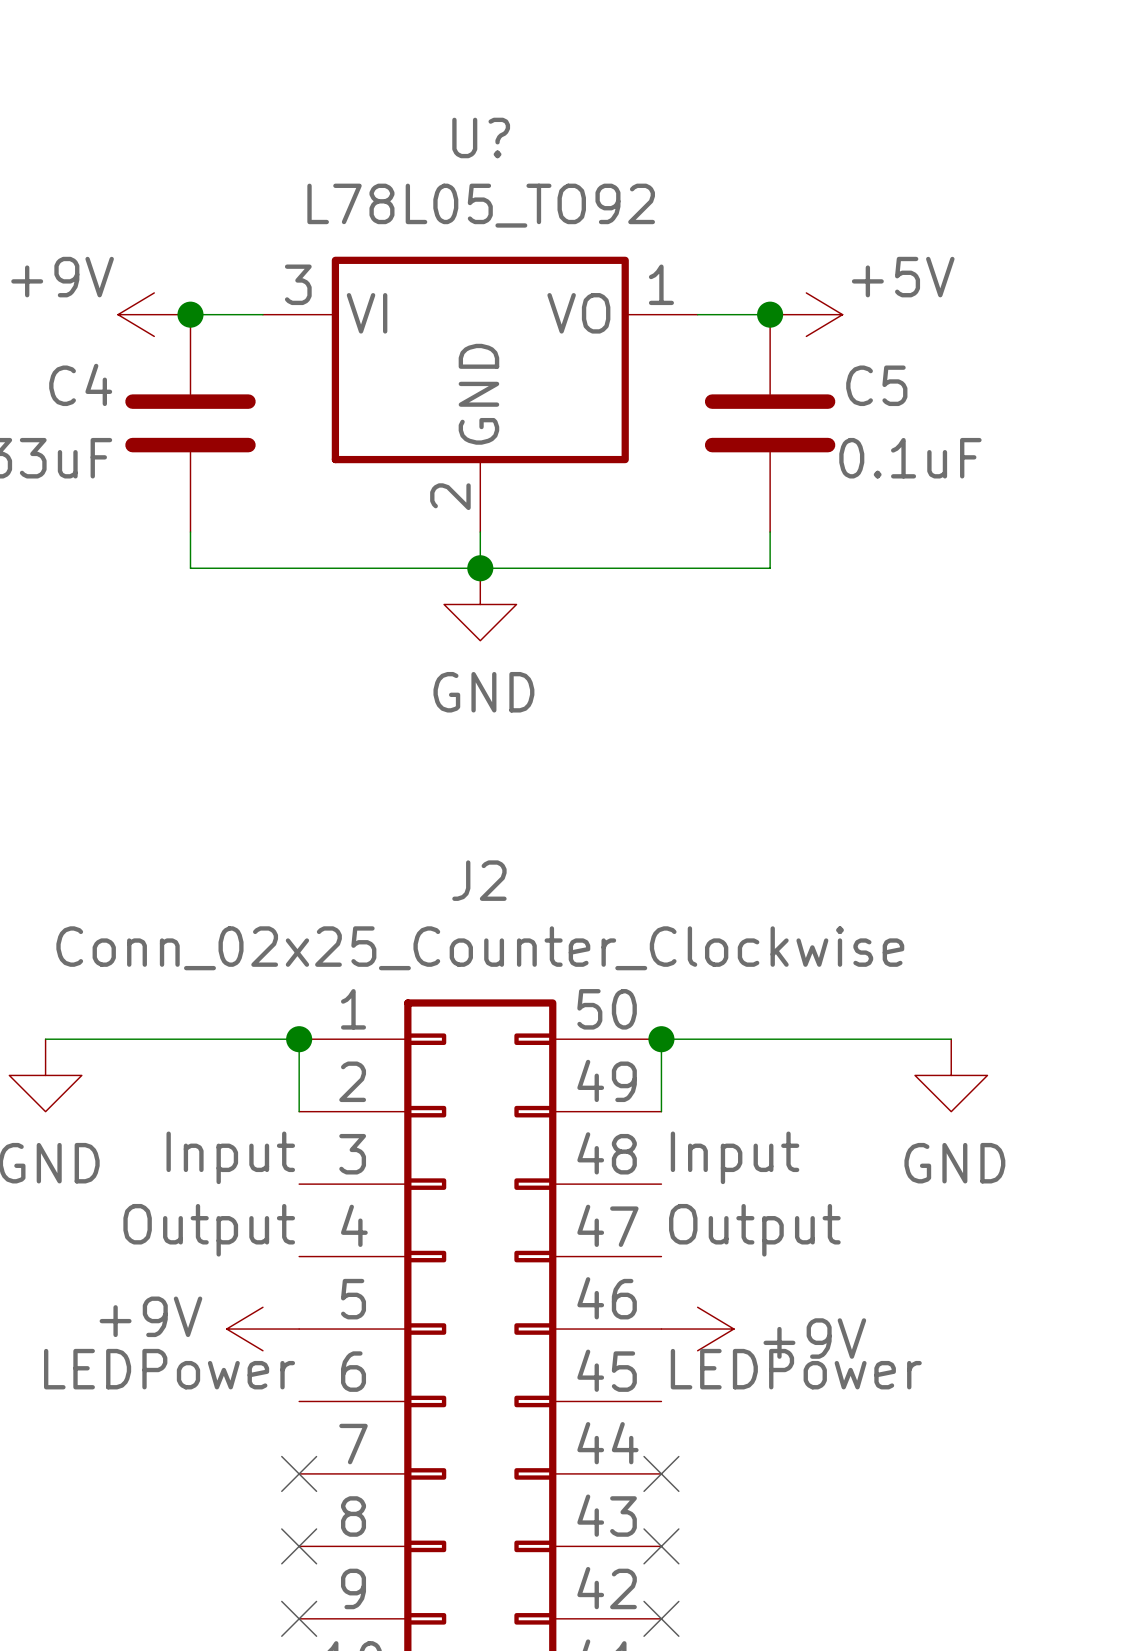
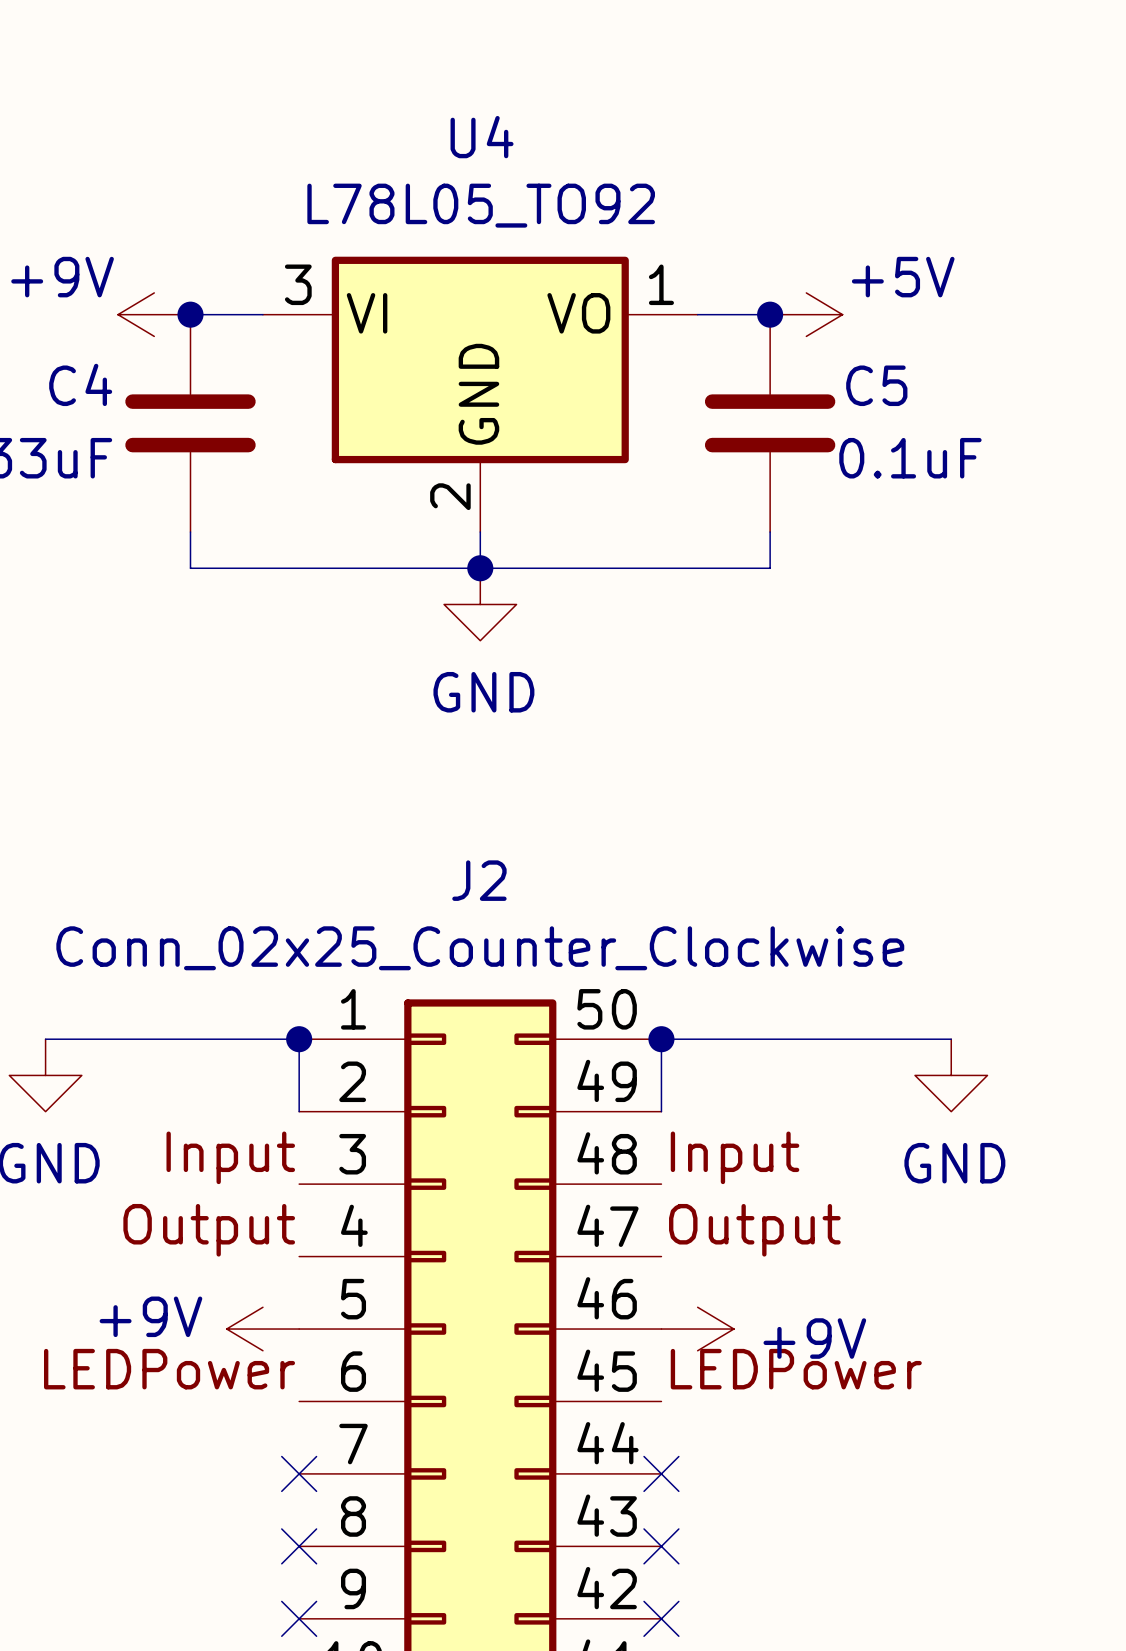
U? name: U? (481, 137) -> U4 (482, 137)

